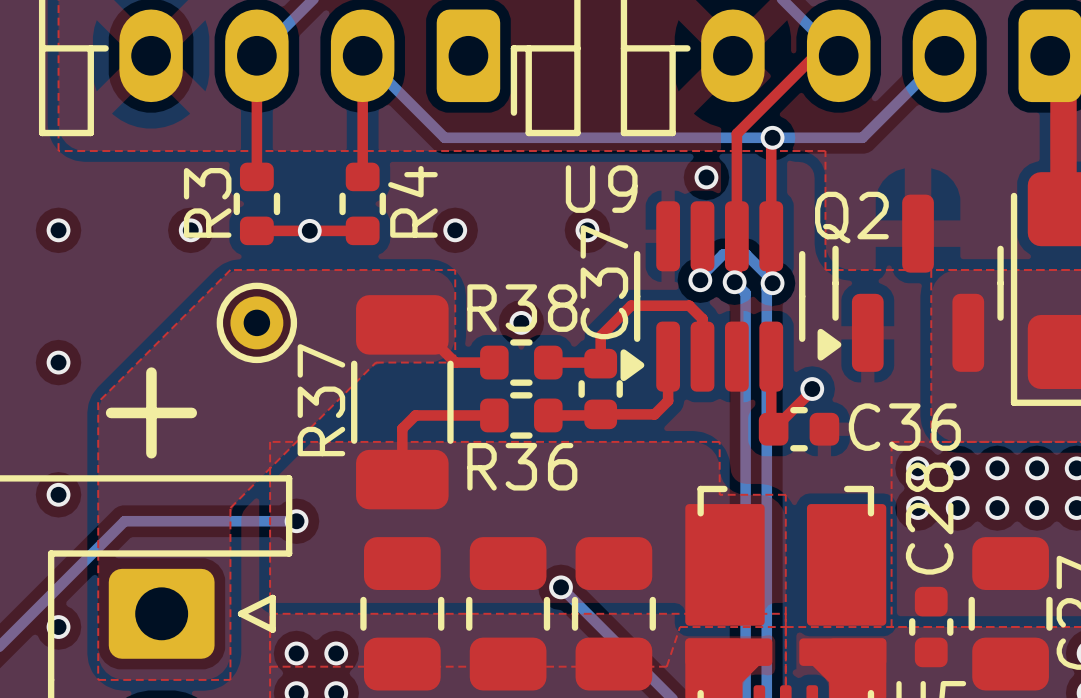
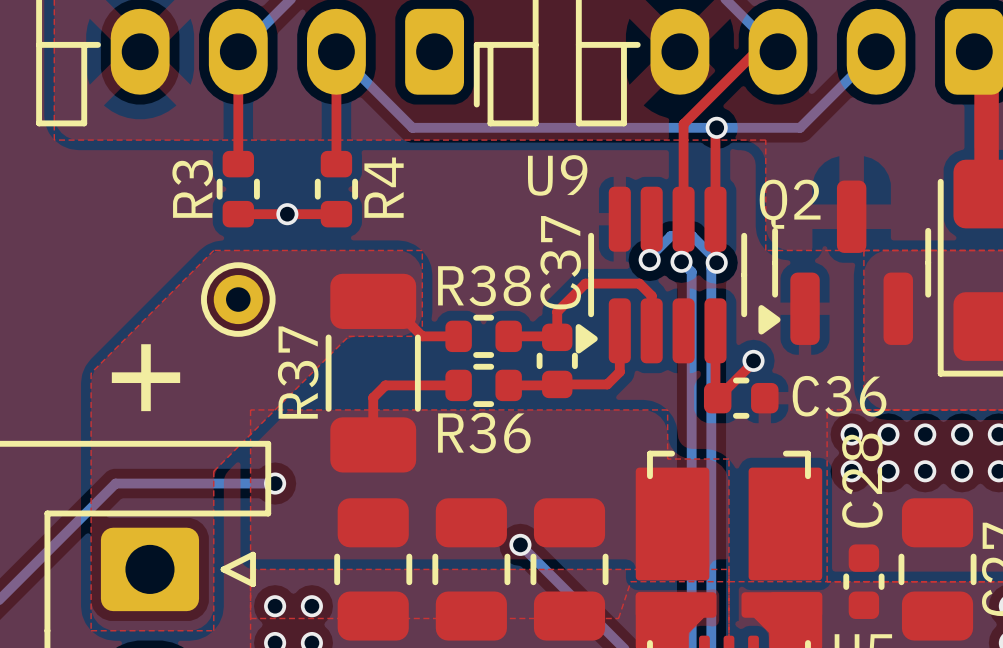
via: (706, 177) -> none
via: (58, 230) -> none
via: (190, 230) -> none
via: (455, 230) -> none
via: (587, 230) -> none
via: (521, 322) -> none
via: (58, 362) -> none
via: (58, 494) -> none
via: (58, 627) -> none

